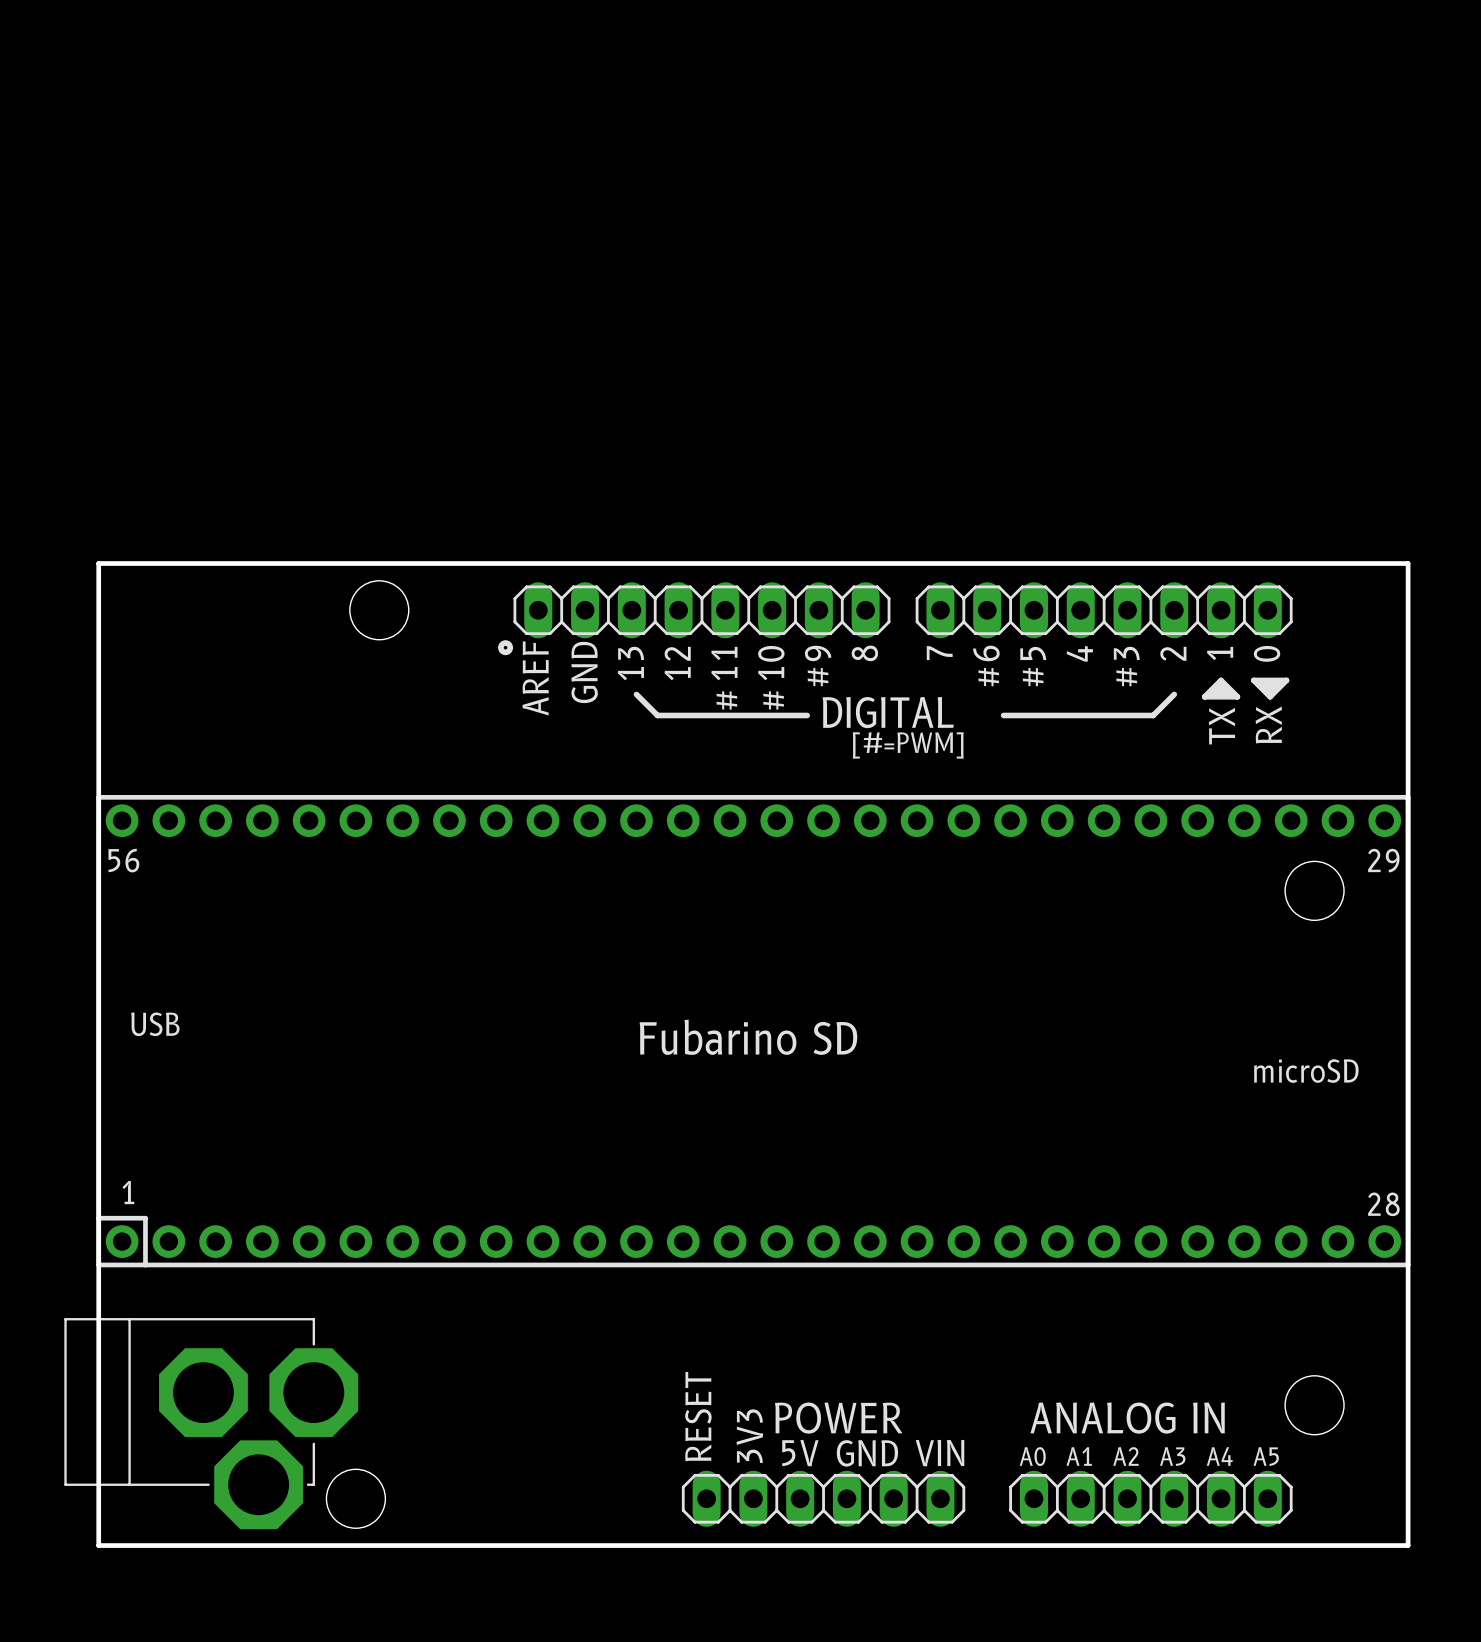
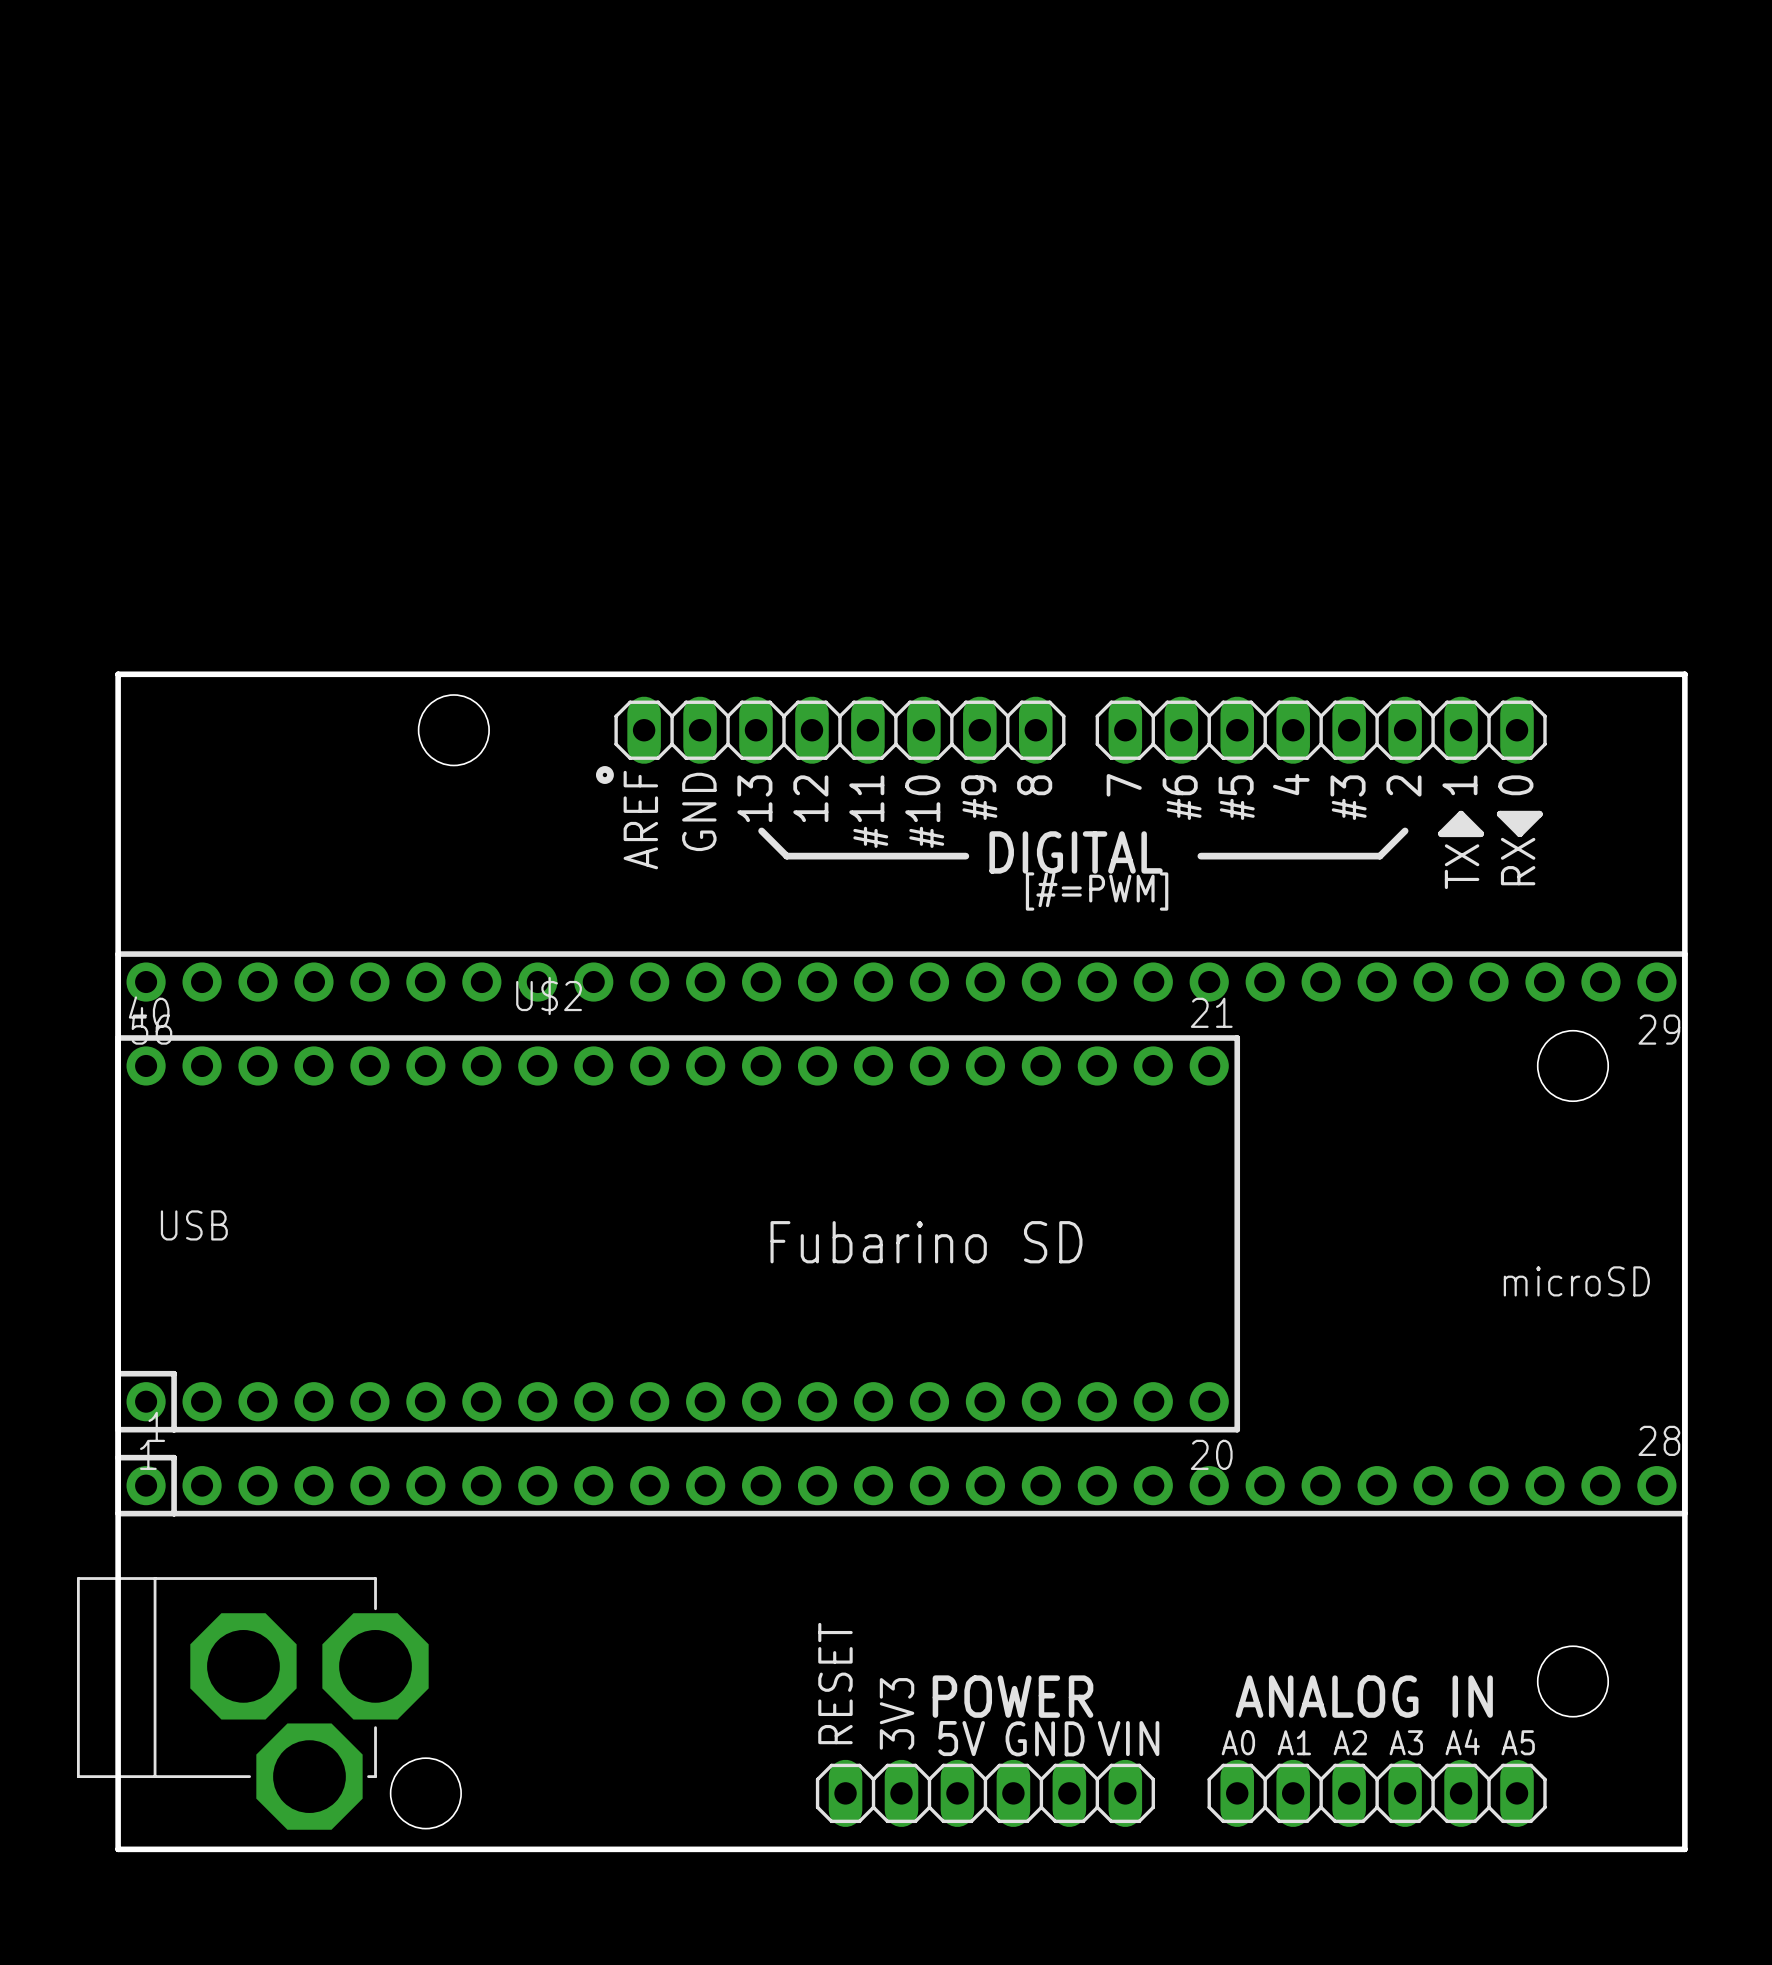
U$2: none -> (677, 1233)

